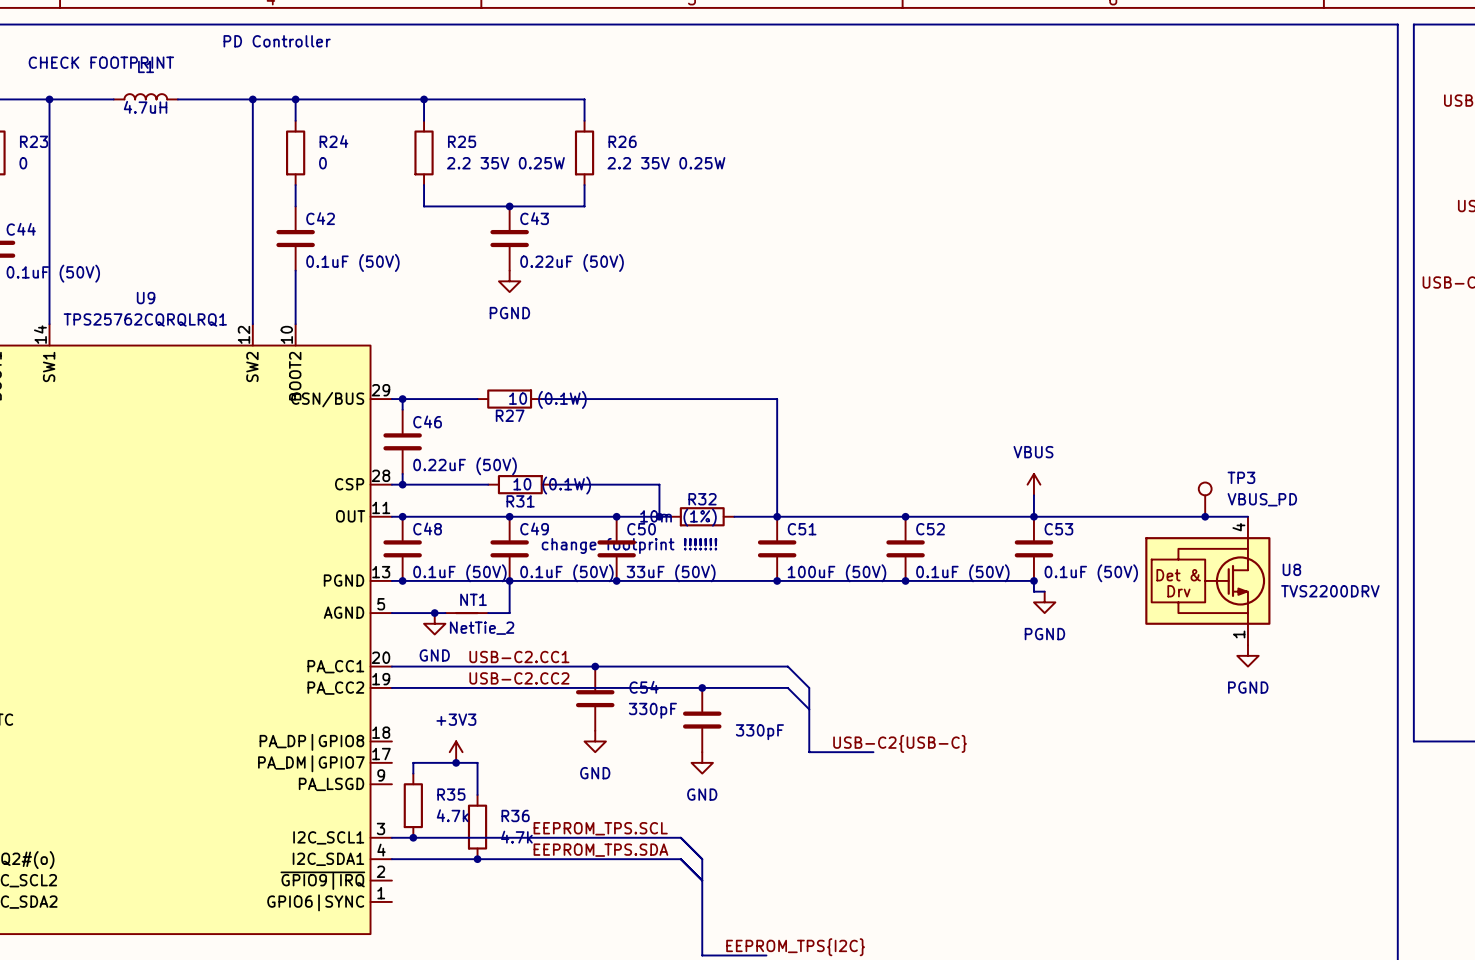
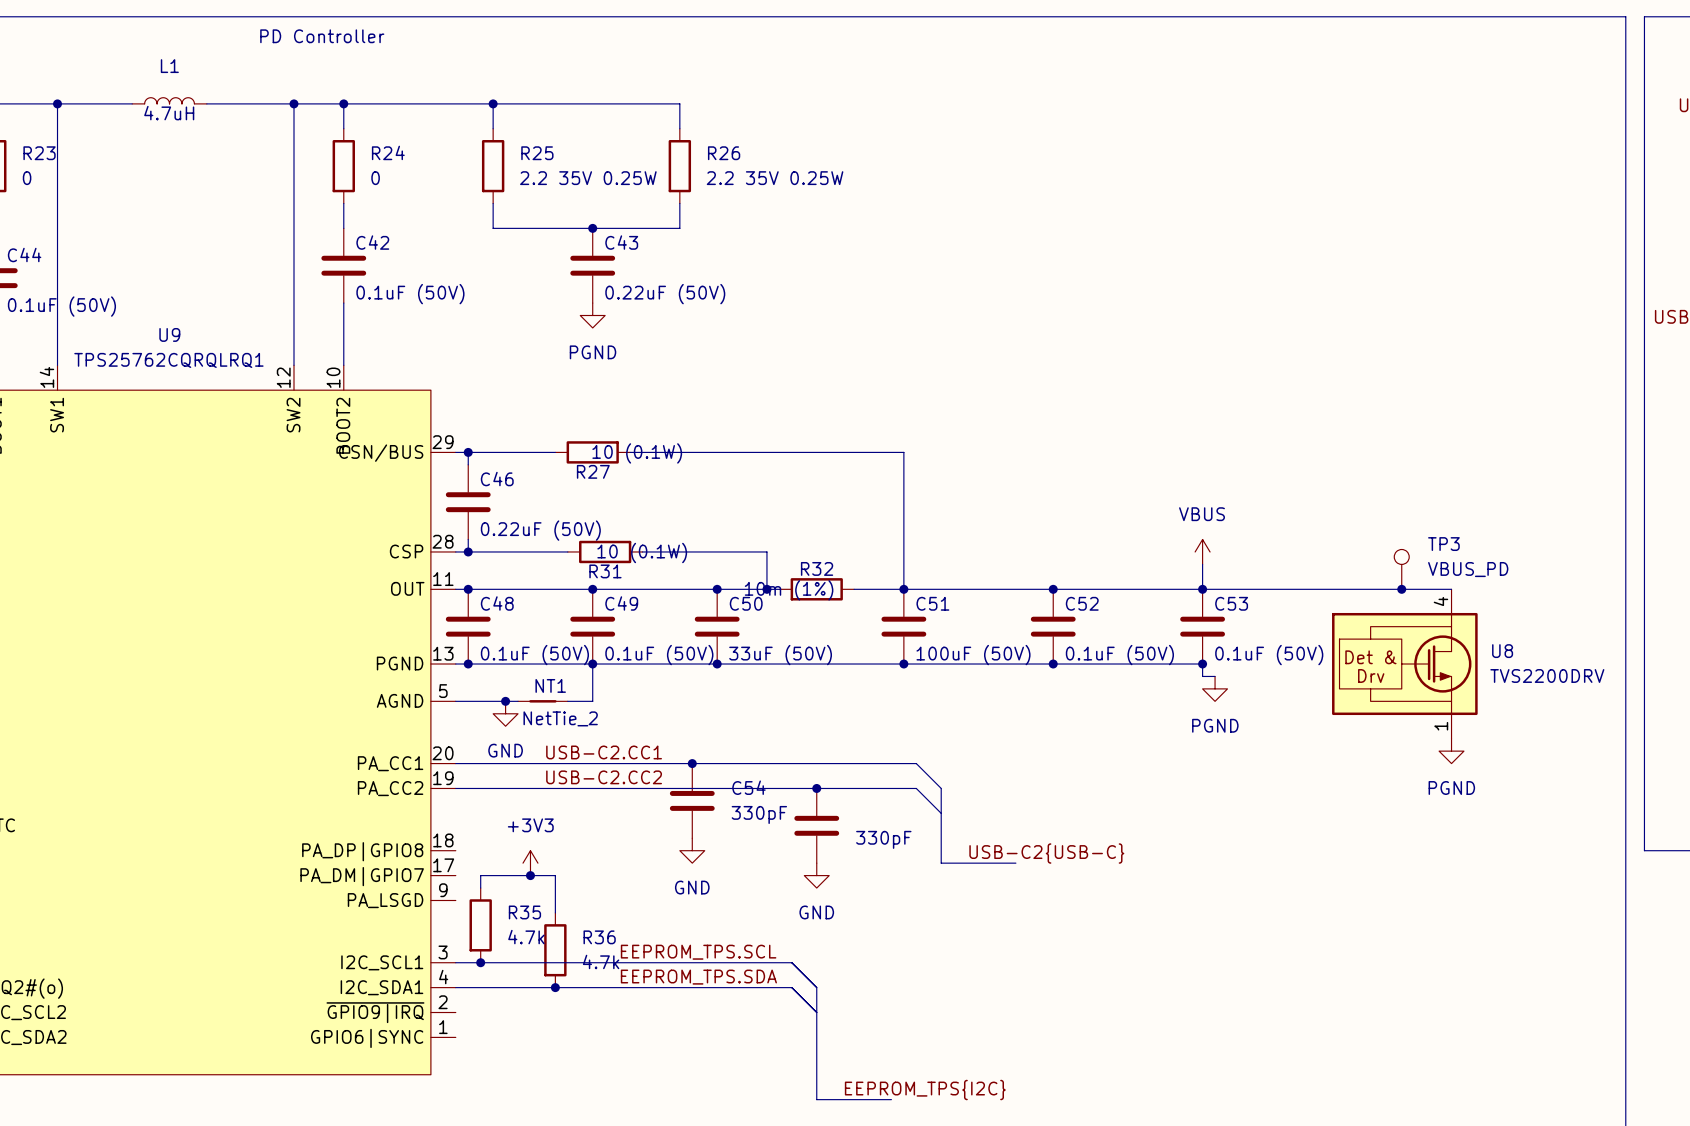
text: CHECK FOOTPRINT (101, 62) -> none
text: change footprint !!!!!!! (629, 545) -> none

